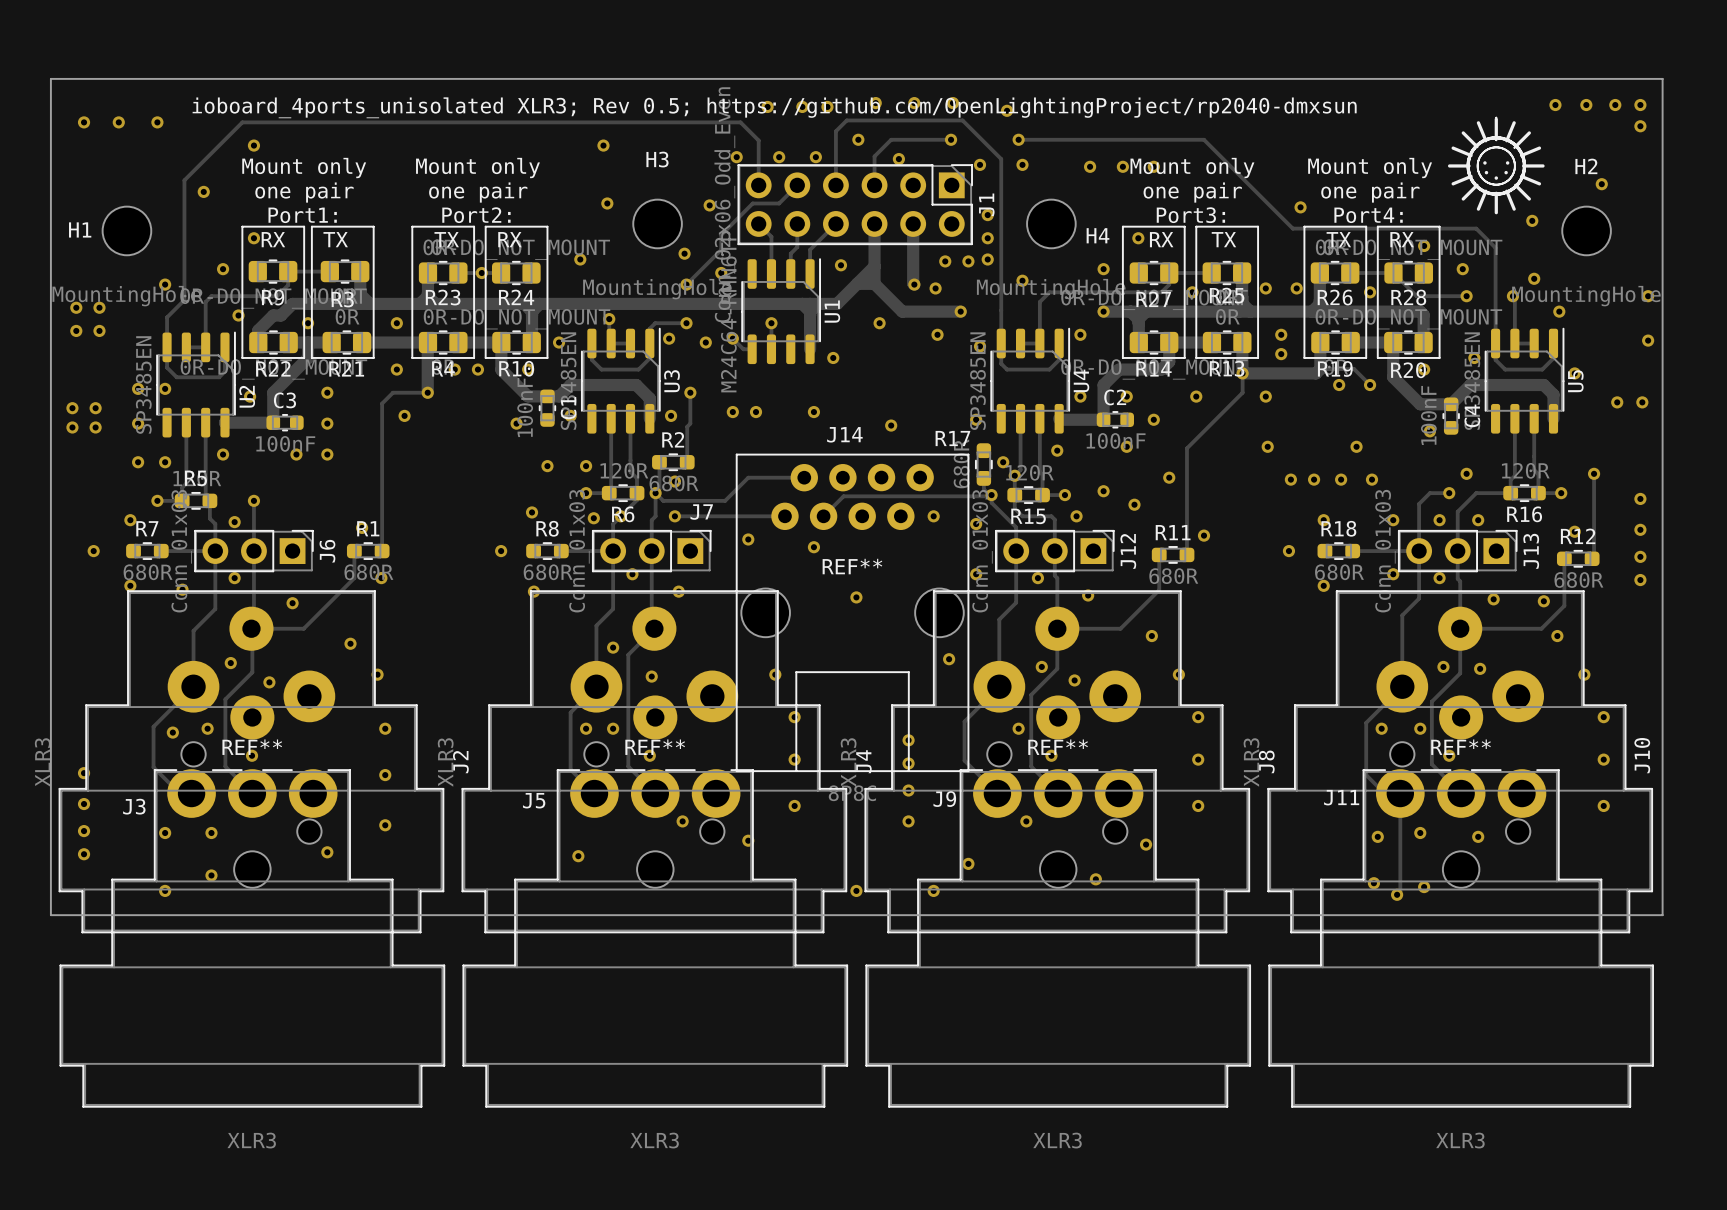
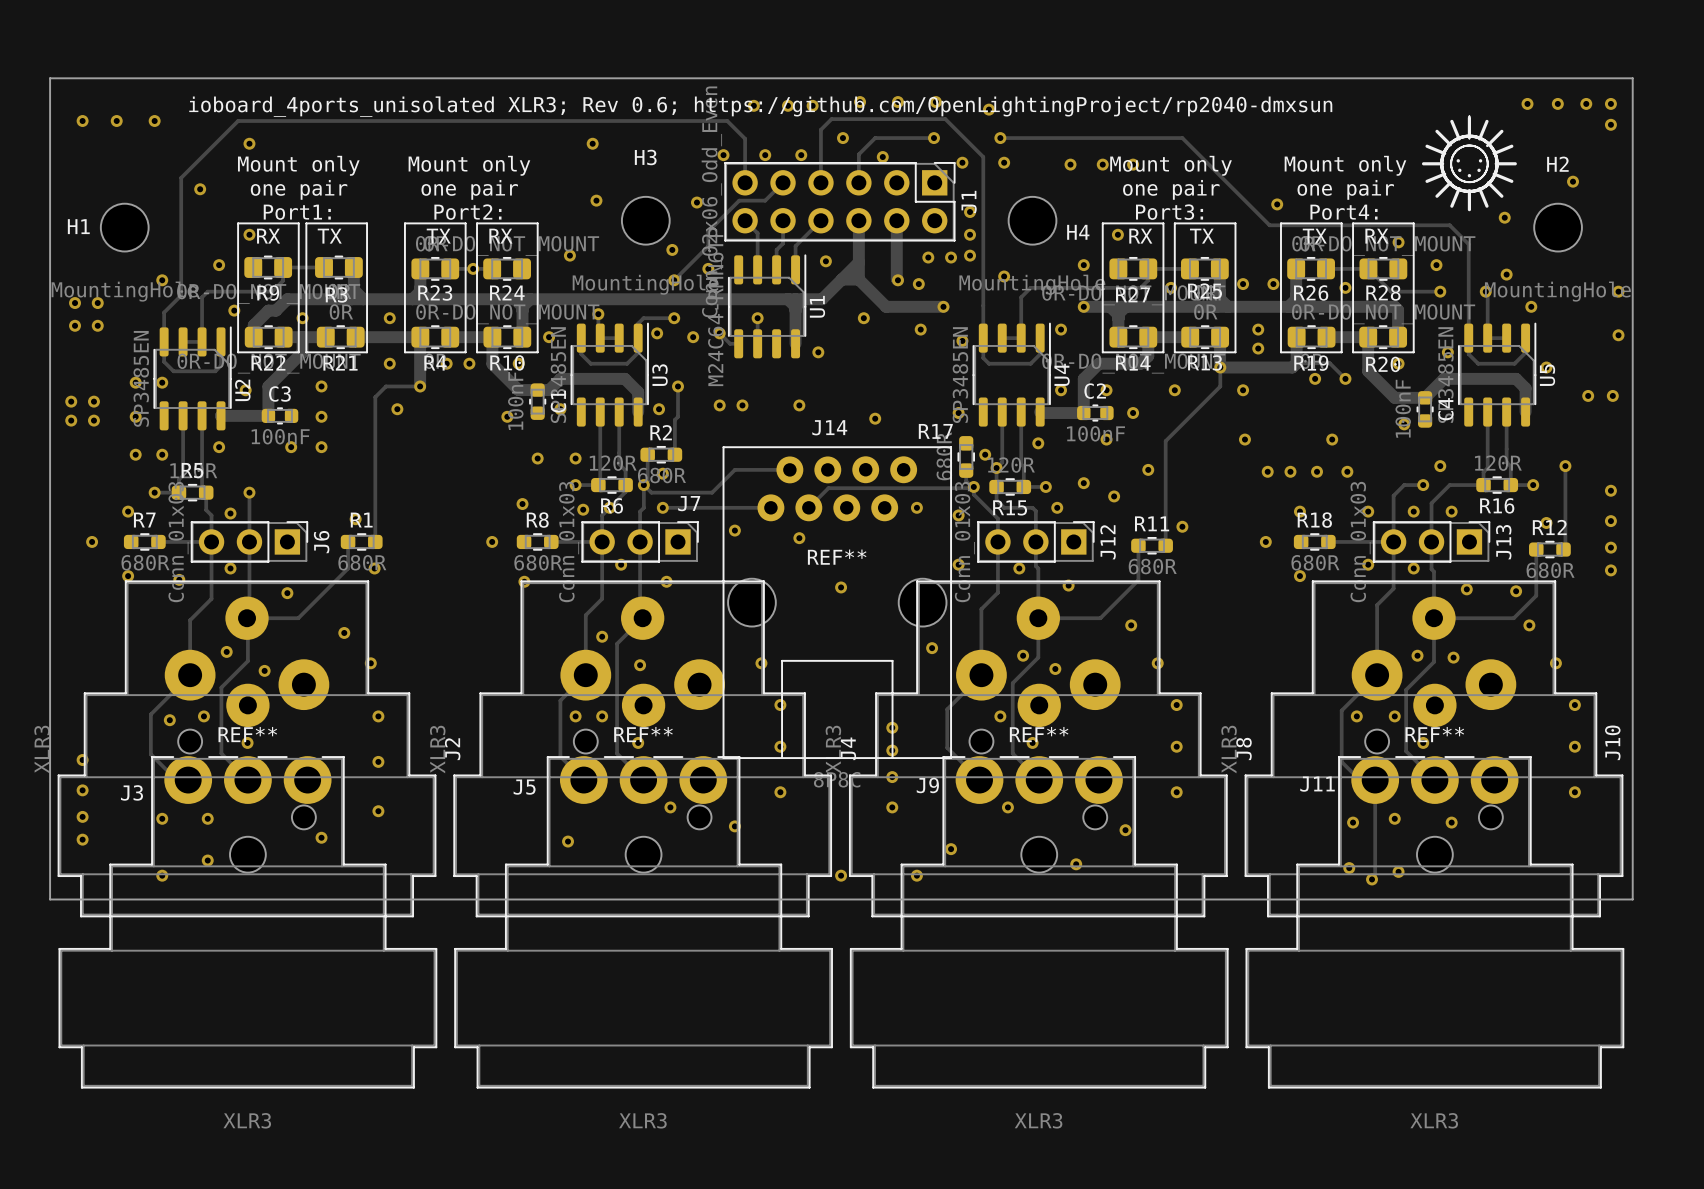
text: ioboard_4ports_unisolated XLR3; Rev 0.5; https://github.com/OpenLightingProject/rp2040-dmxsun (774, 107) -> ioboard_4ports_unisolated XLR3; Rev 0.6; https://github.com/OpenLightingProject/rp2040-dmxsun (760, 106)

